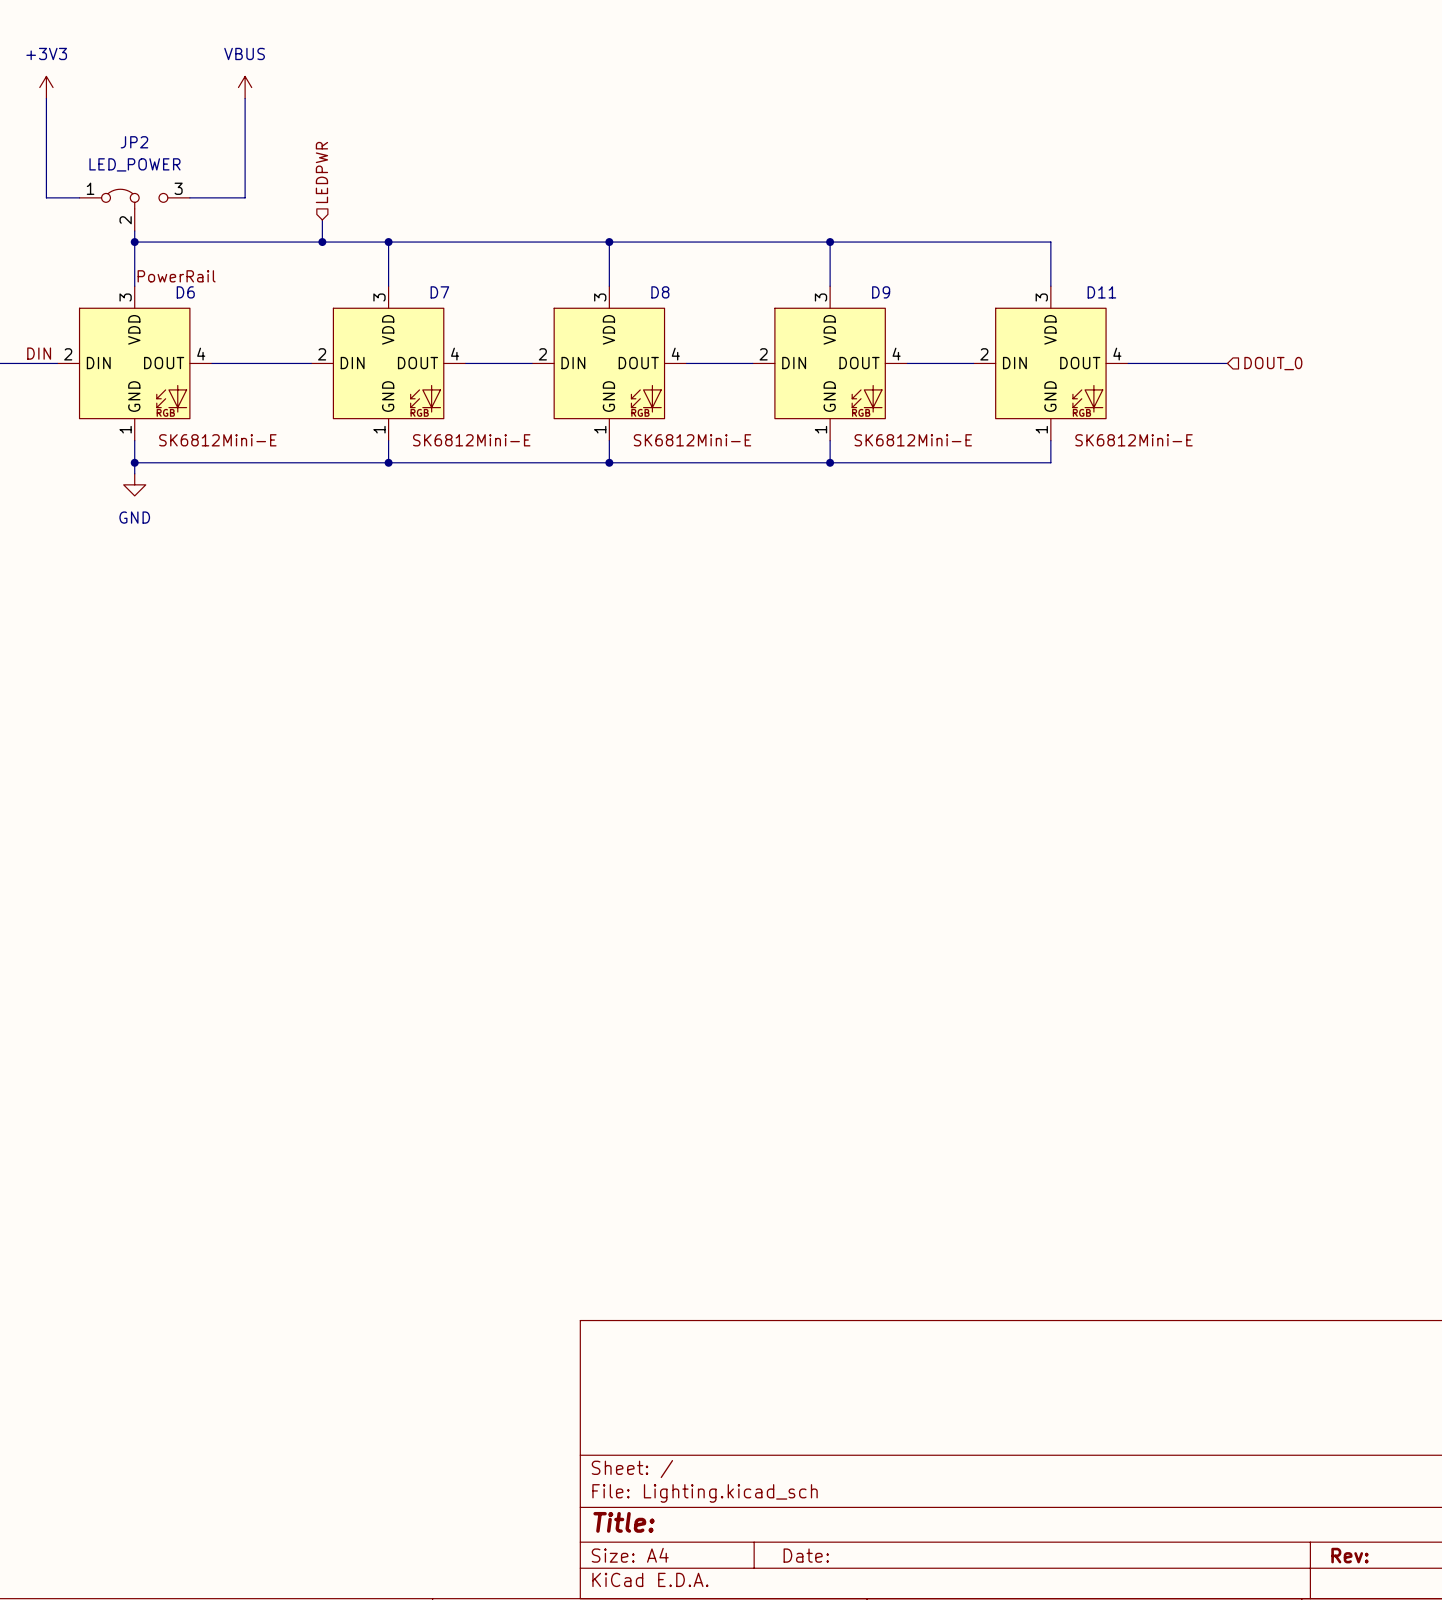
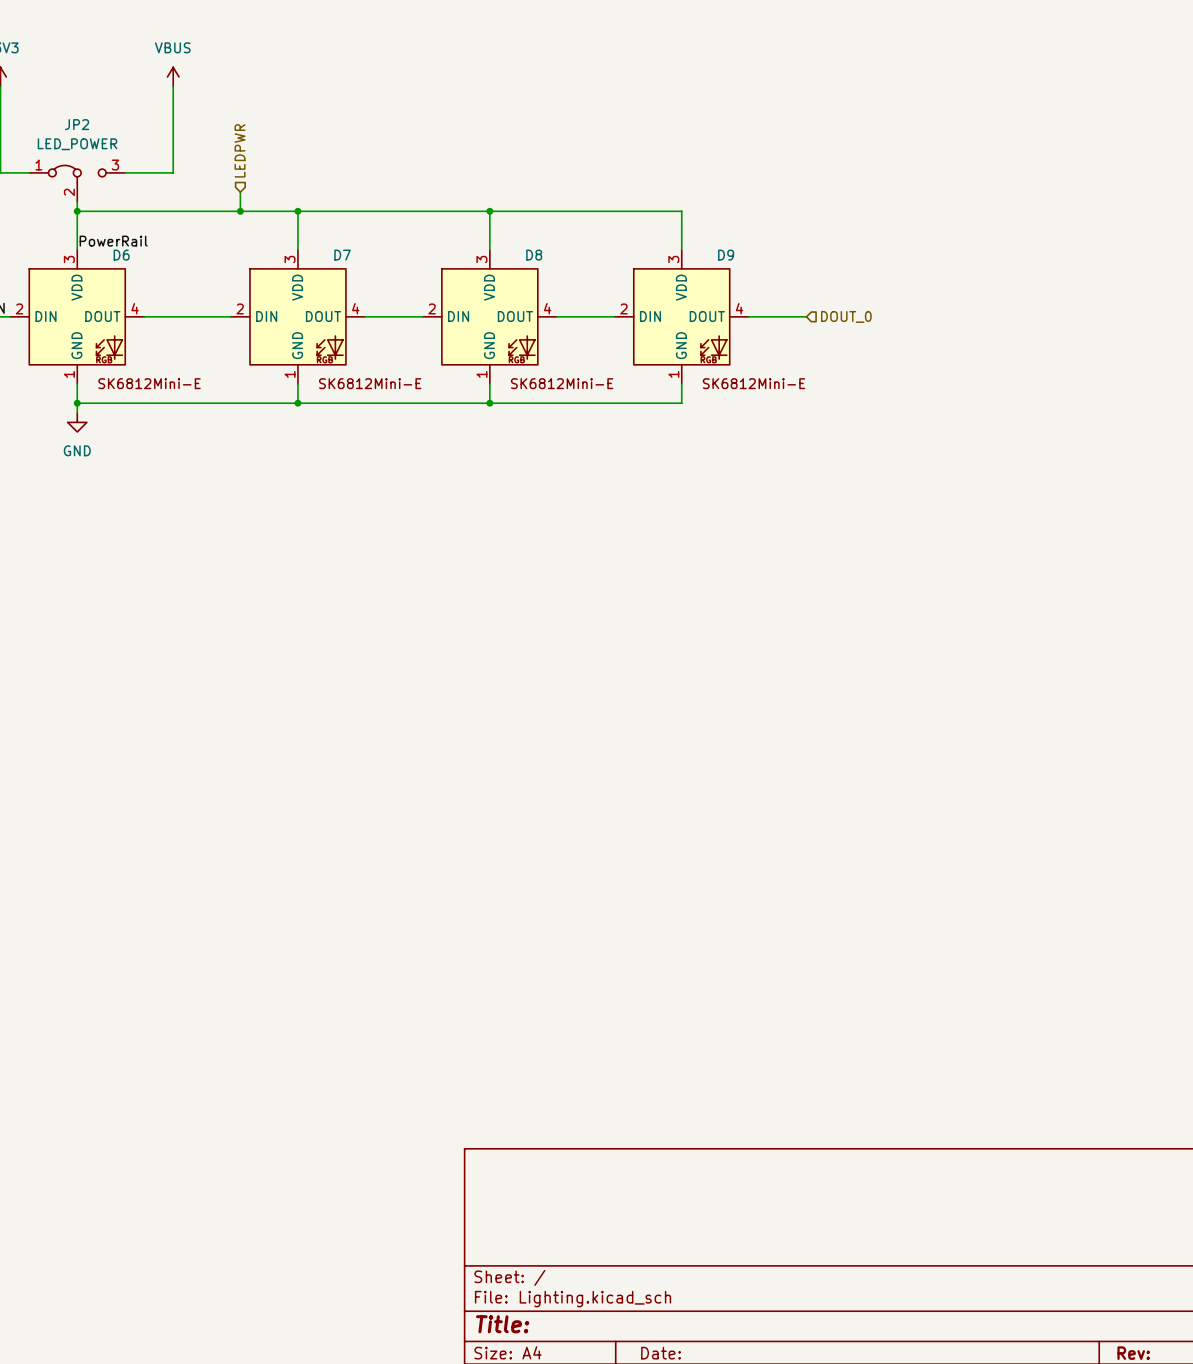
wire: (830, 242) (1050, 242) (1050, 286) -> none
junction: (830, 242) -> none
hierarchical label: none -> DOUT_0 (846, 316)
D11: (1050, 363) -> none
wire: (1128, 363) (1227, 363) -> none
hierarchical label: DOUT_0 (1273, 363) -> none
wire: (1050, 440) (1050, 462) (830, 462) -> none
junction: (830, 462) -> none

